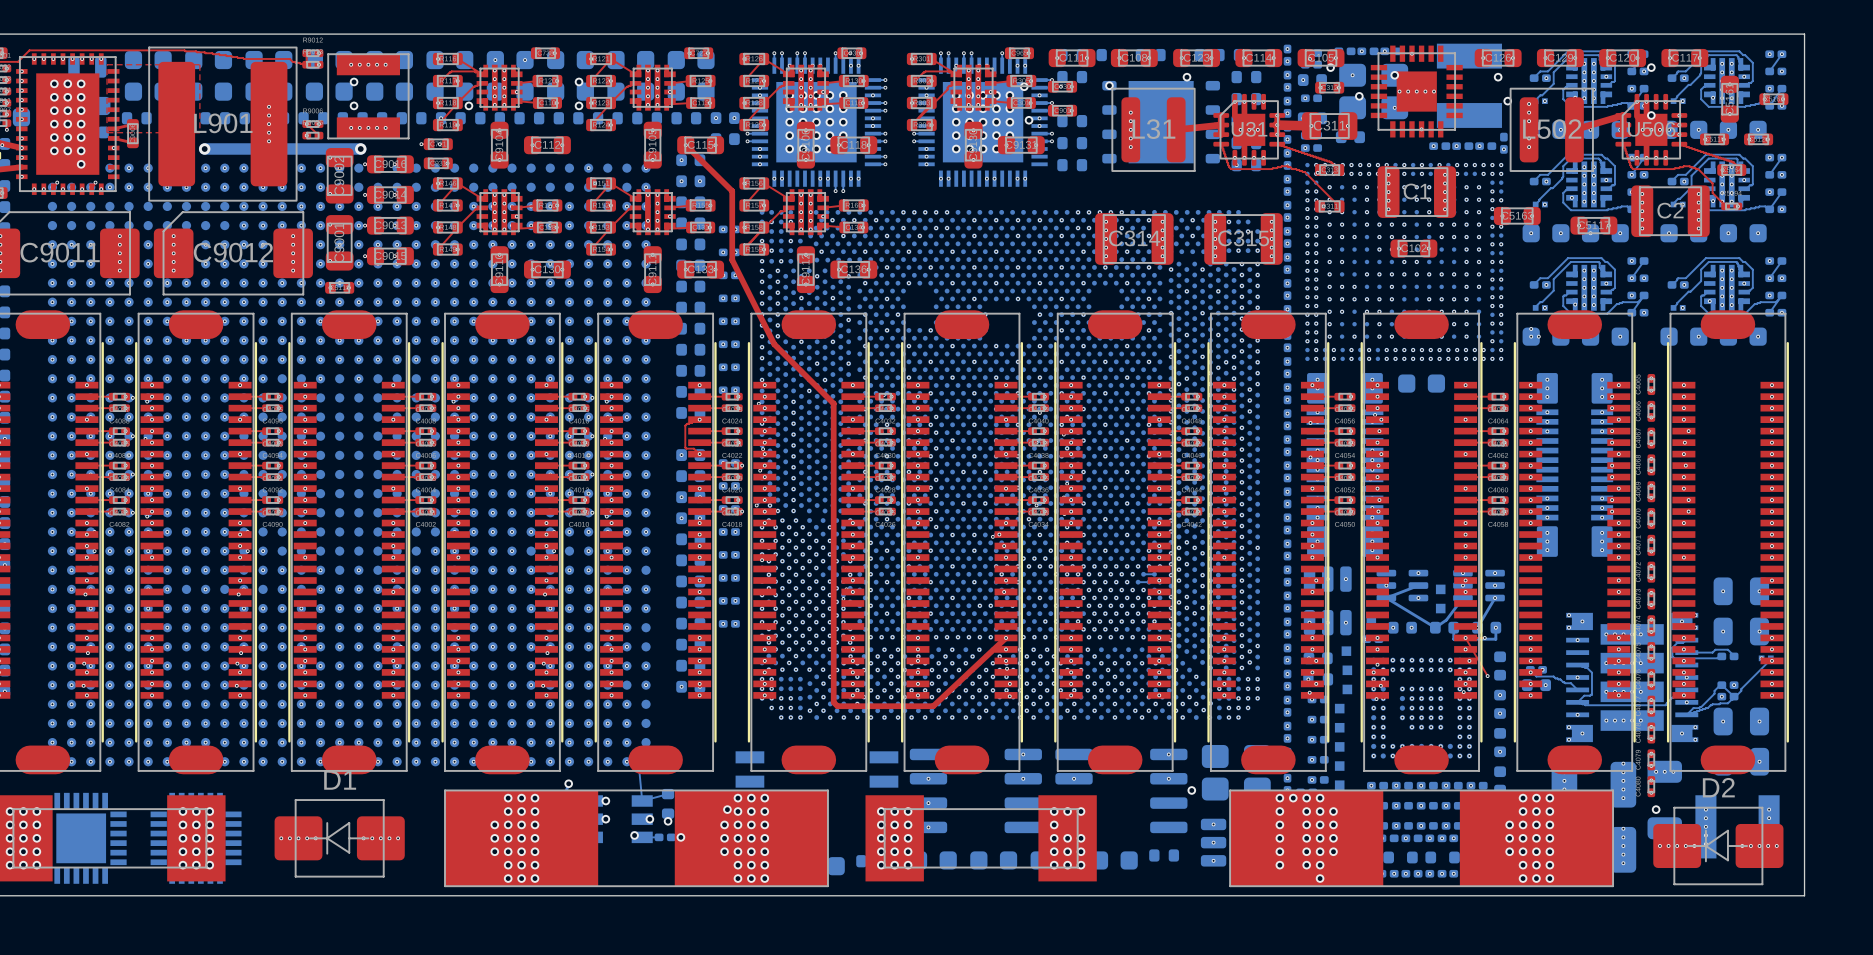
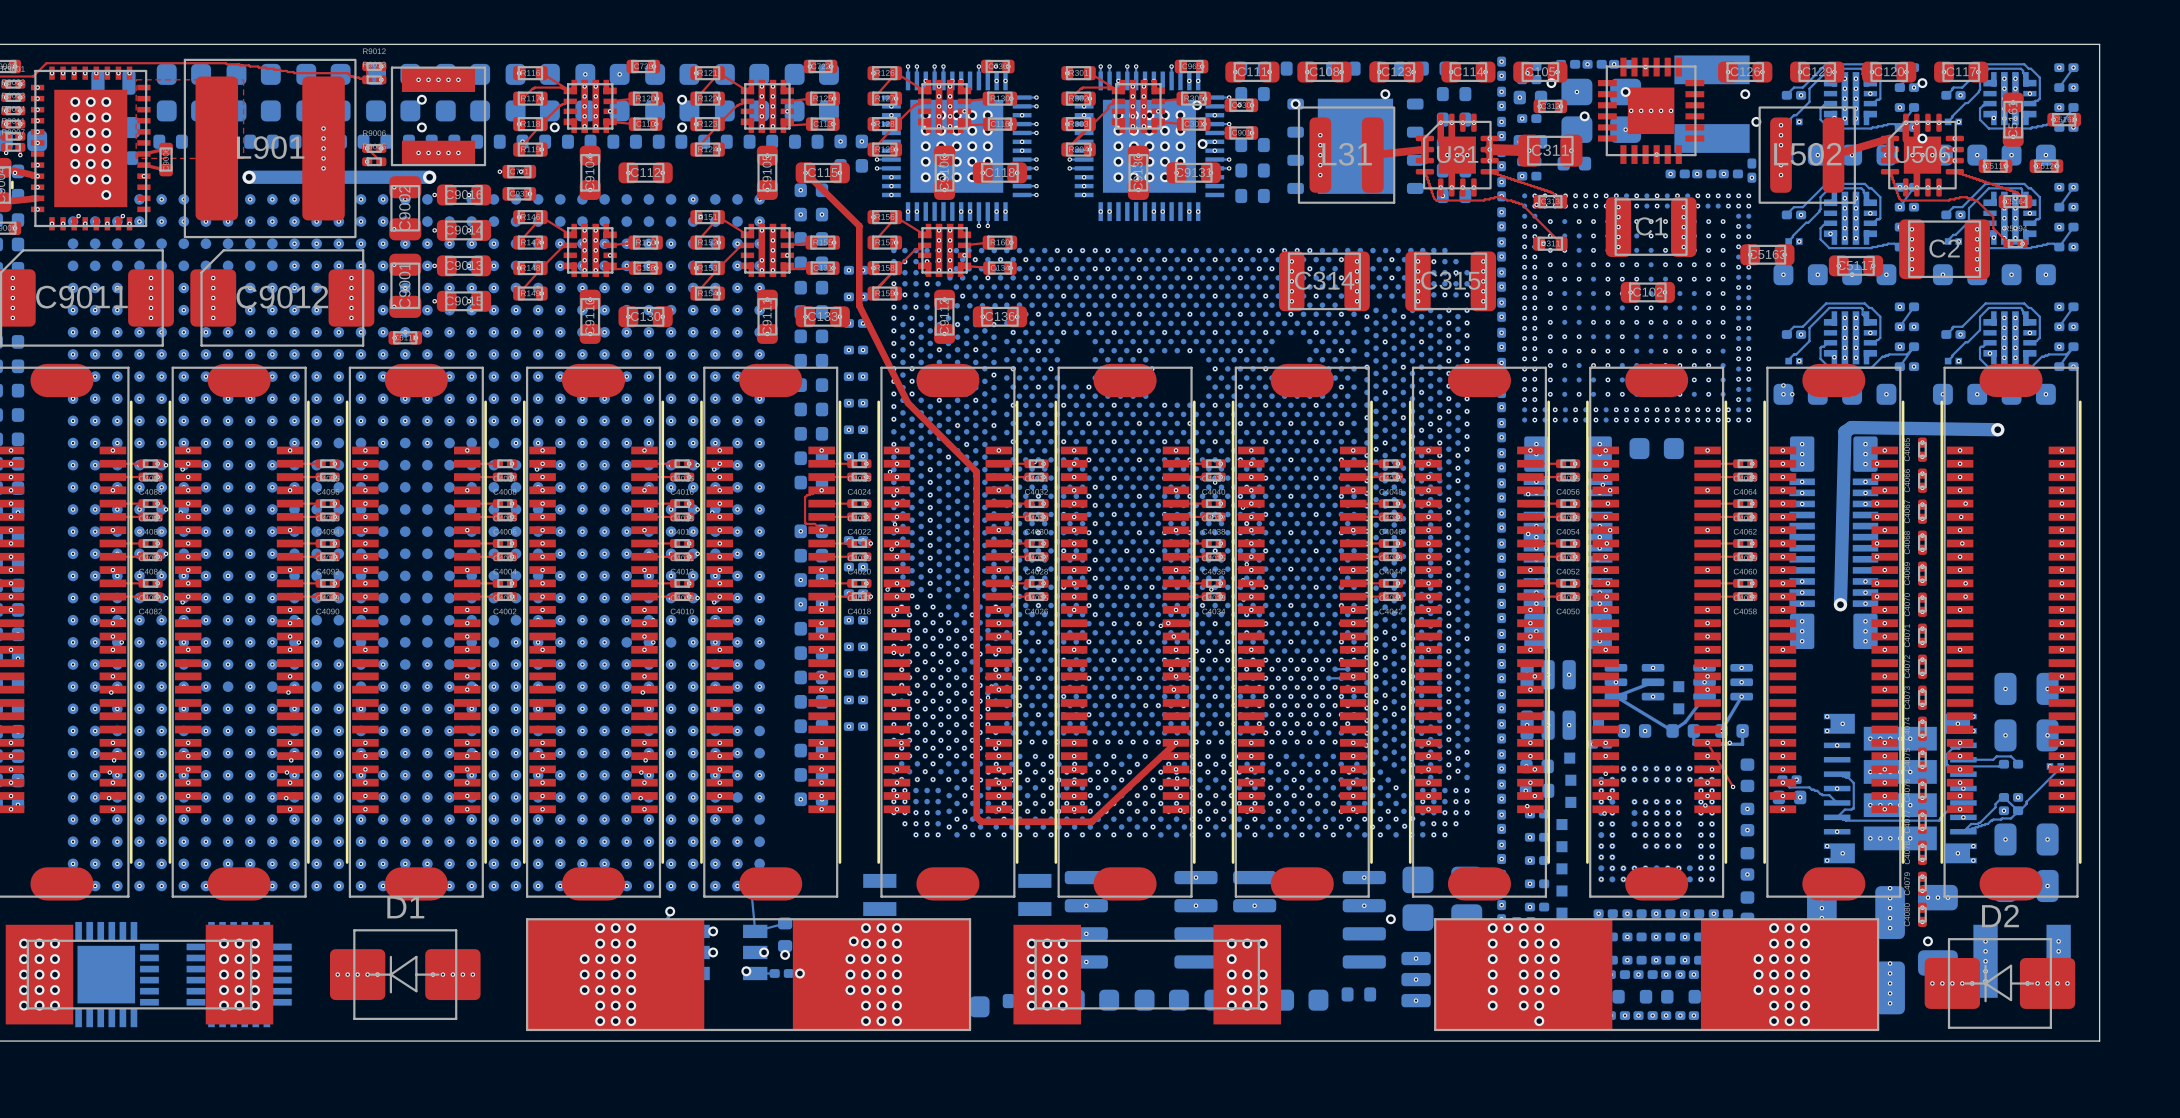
bottom track: none -> (1997, 429) (1851, 427) (1844, 431) (1840, 604)
via: none -> (1997, 429)
via: none -> (1840, 604)

